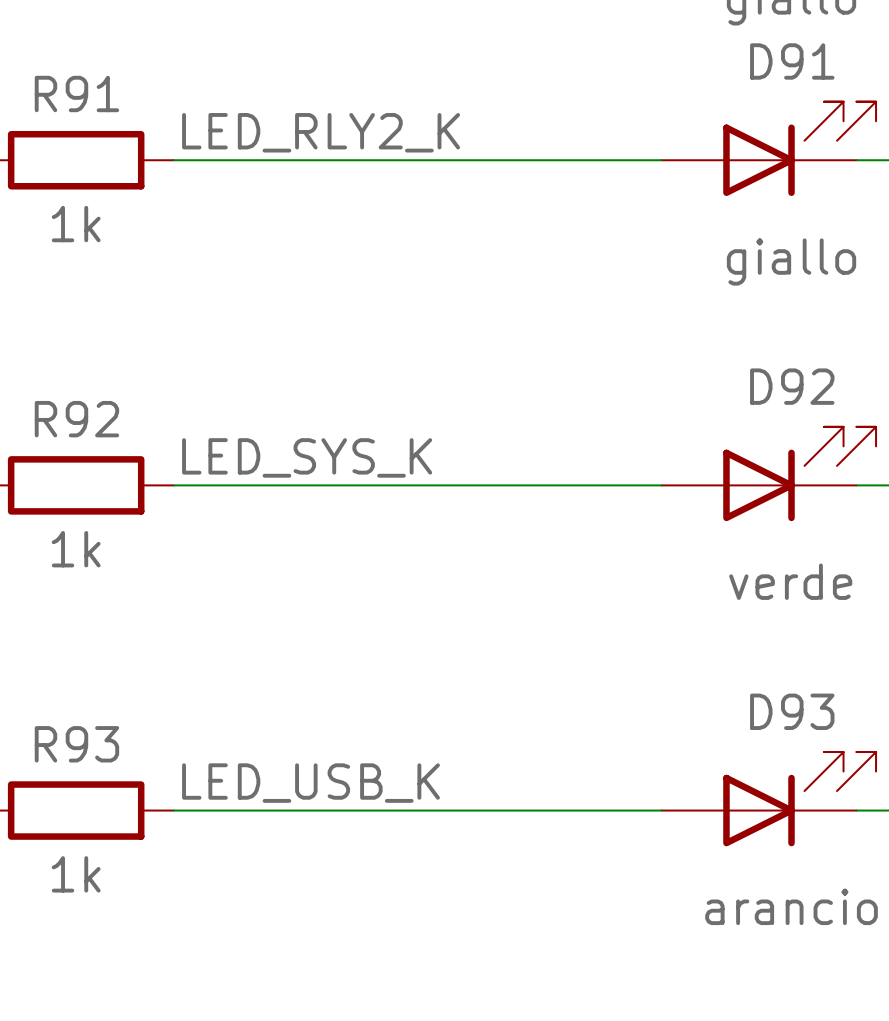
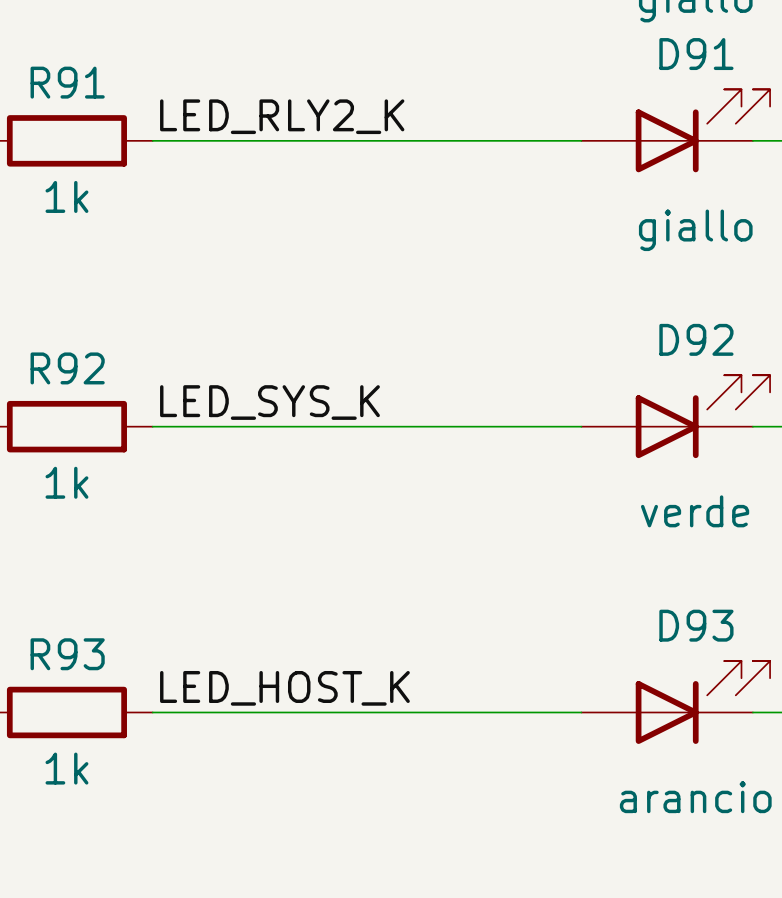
label: LED_USB_K (310, 783) -> LED_HOST_K (284, 688)

